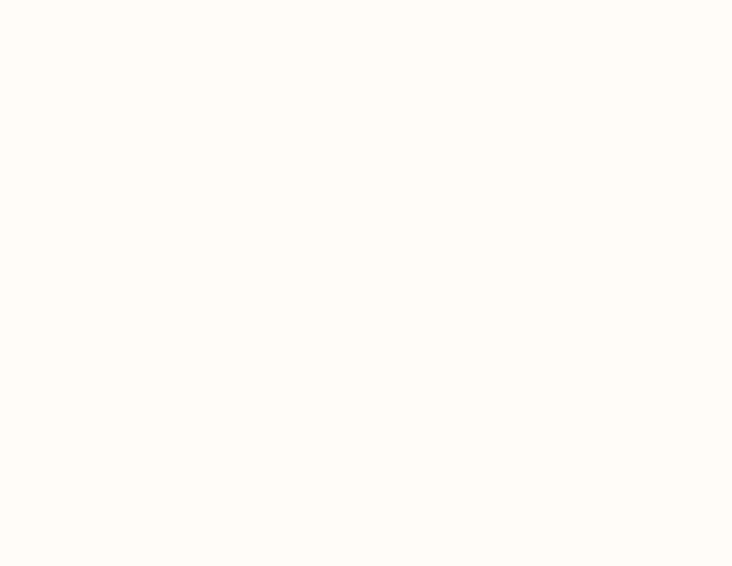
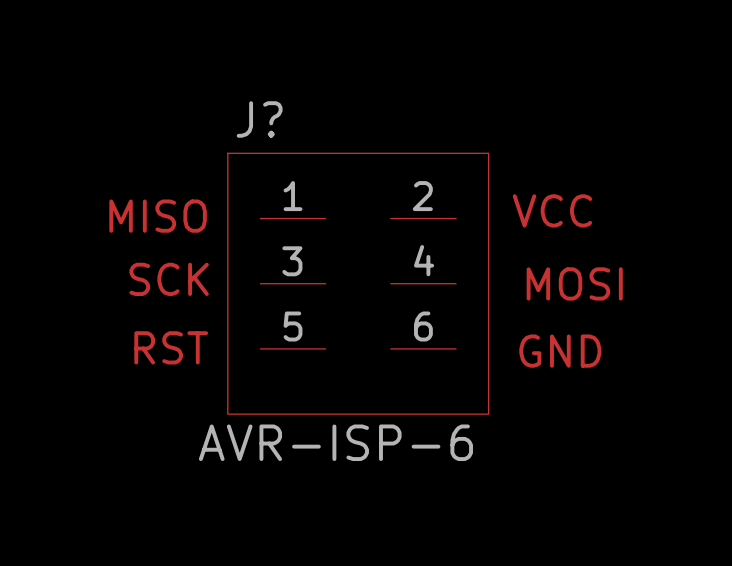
J?: none -> AVR-ISP-6 (358, 283)

